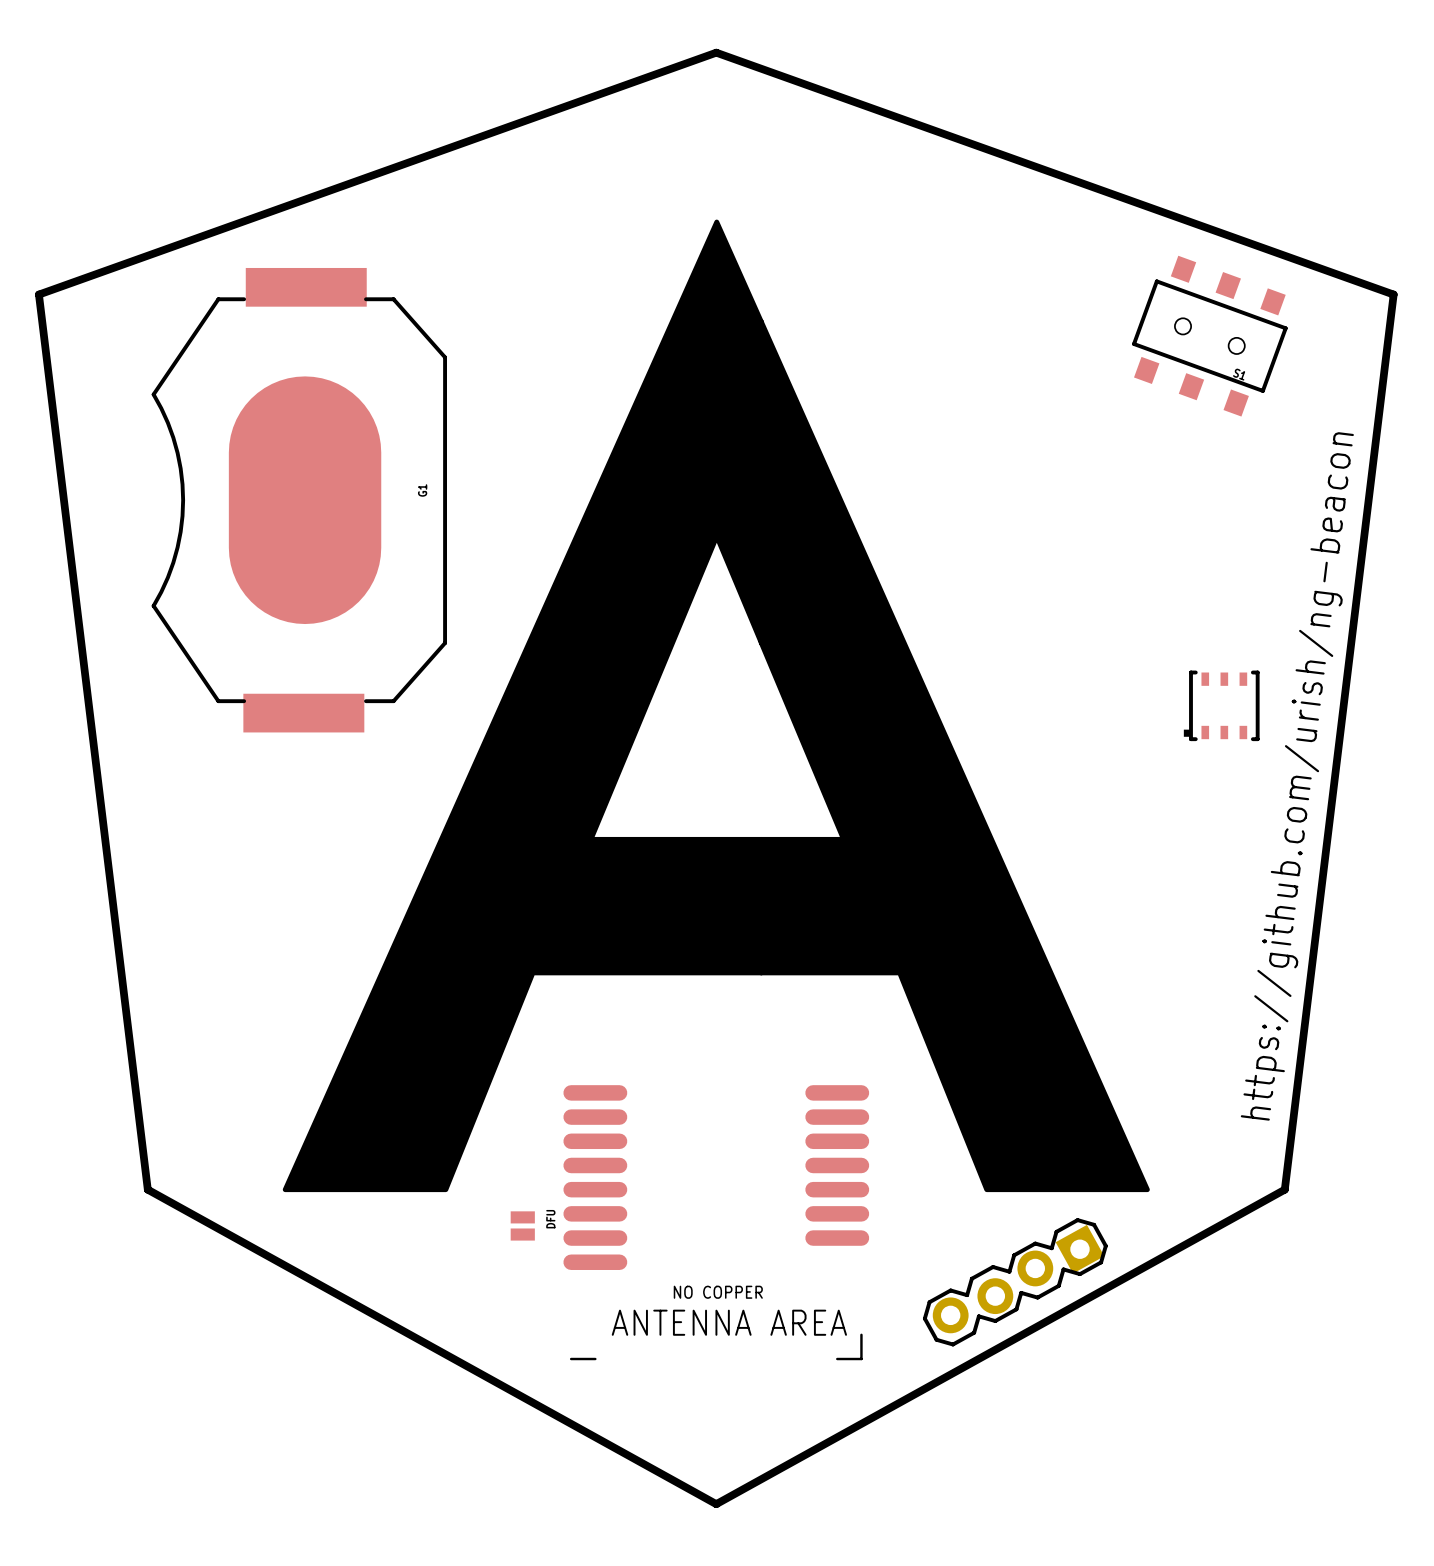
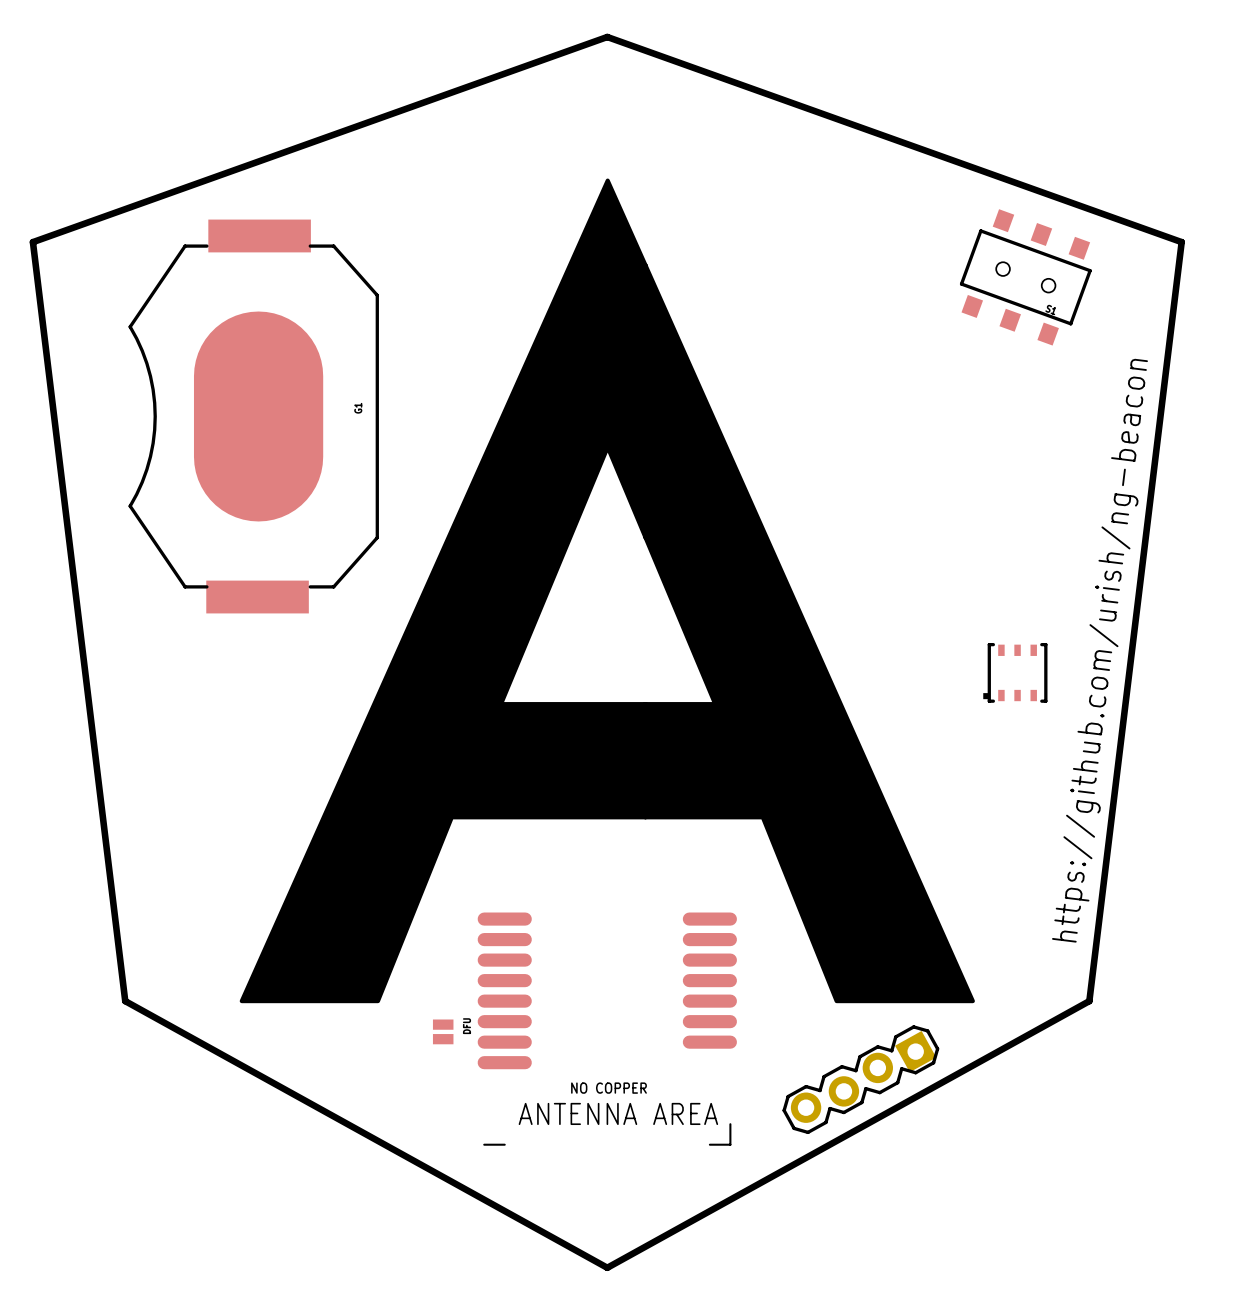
part position: (1221, 705) -> (1015, 672)

